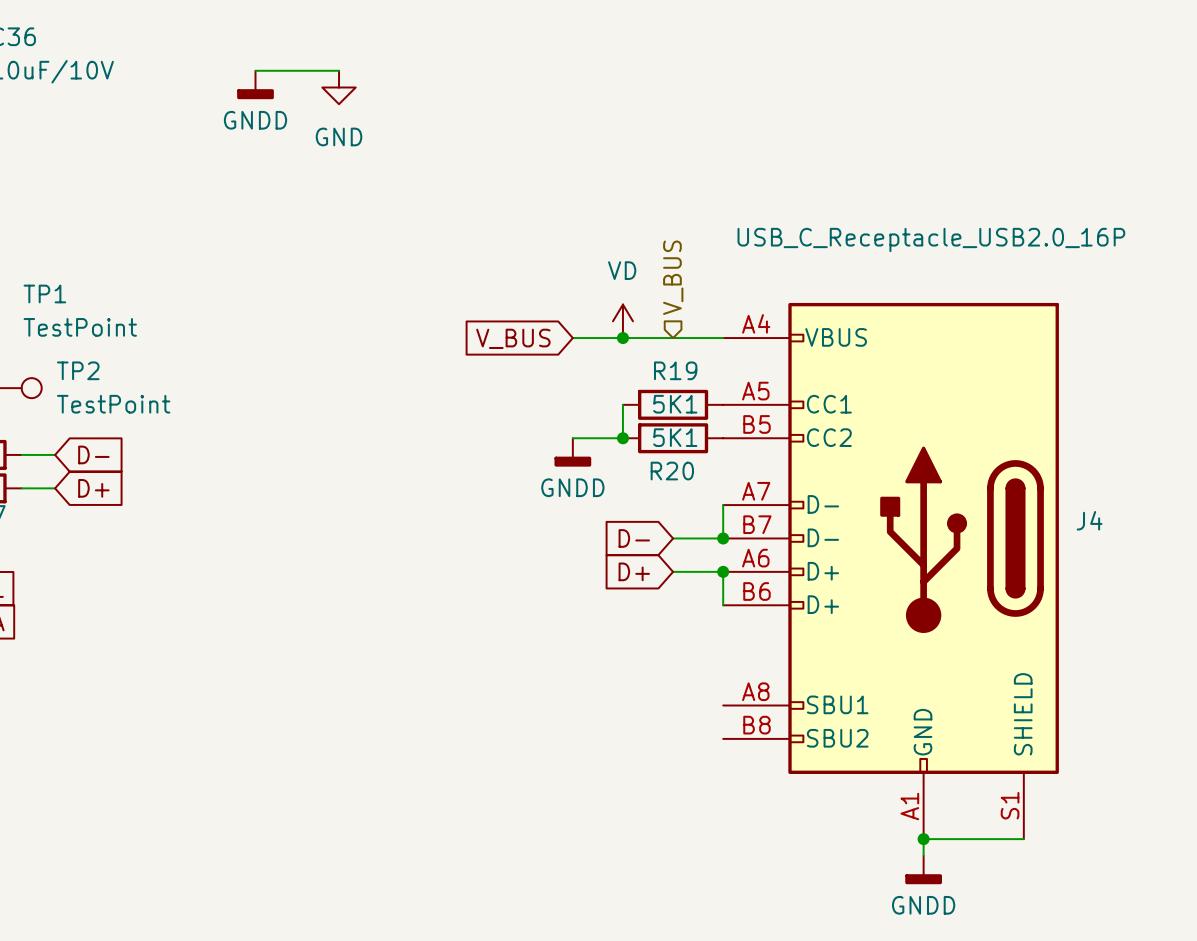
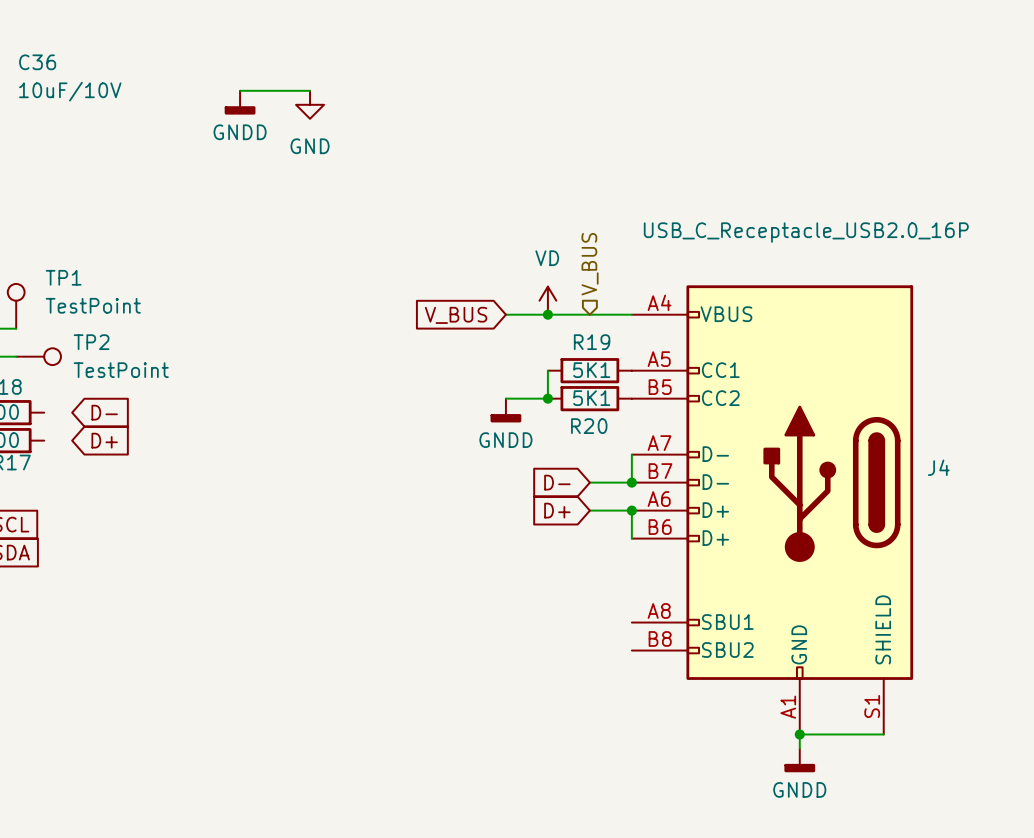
wire: (21, 454) (55, 454) -> none
wire: (21, 488) (55, 488) -> none

